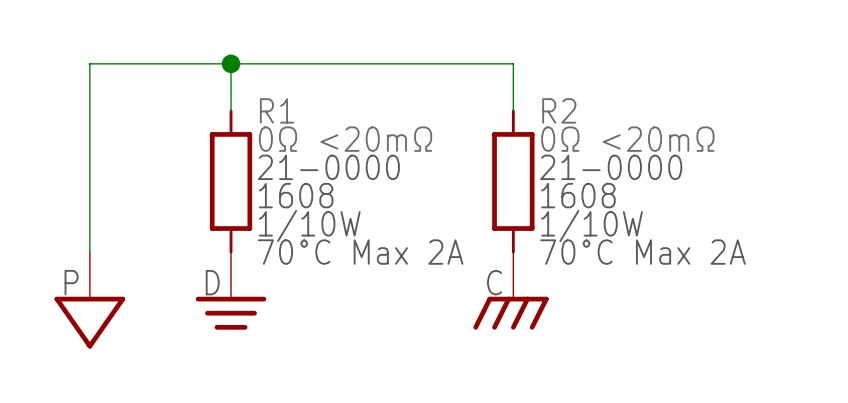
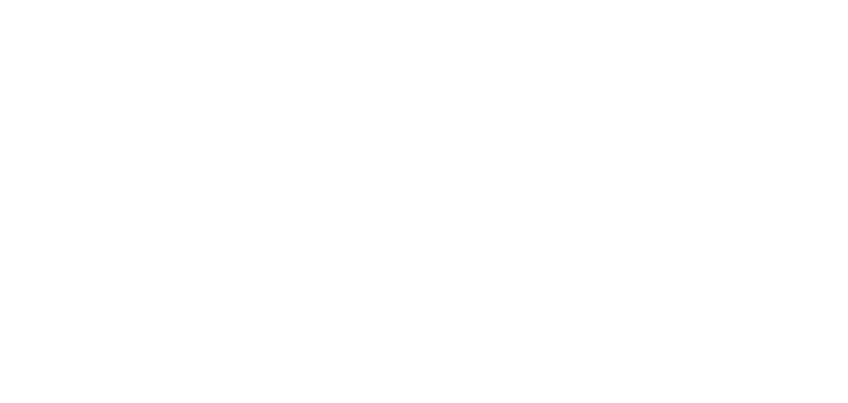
wire: (231, 63) (231, 110) -> none
junction: (231, 63) -> none
wire: (513, 110) (513, 63) (89, 63) (89, 252) -> none
R1: 0Ω <20mΩ (231, 181) -> none
R2: 0Ω <20mΩ (513, 181) -> none
power symbol: (231, 290) -> none
power symbol: (510, 290) -> none
power symbol: (89, 300) -> none

